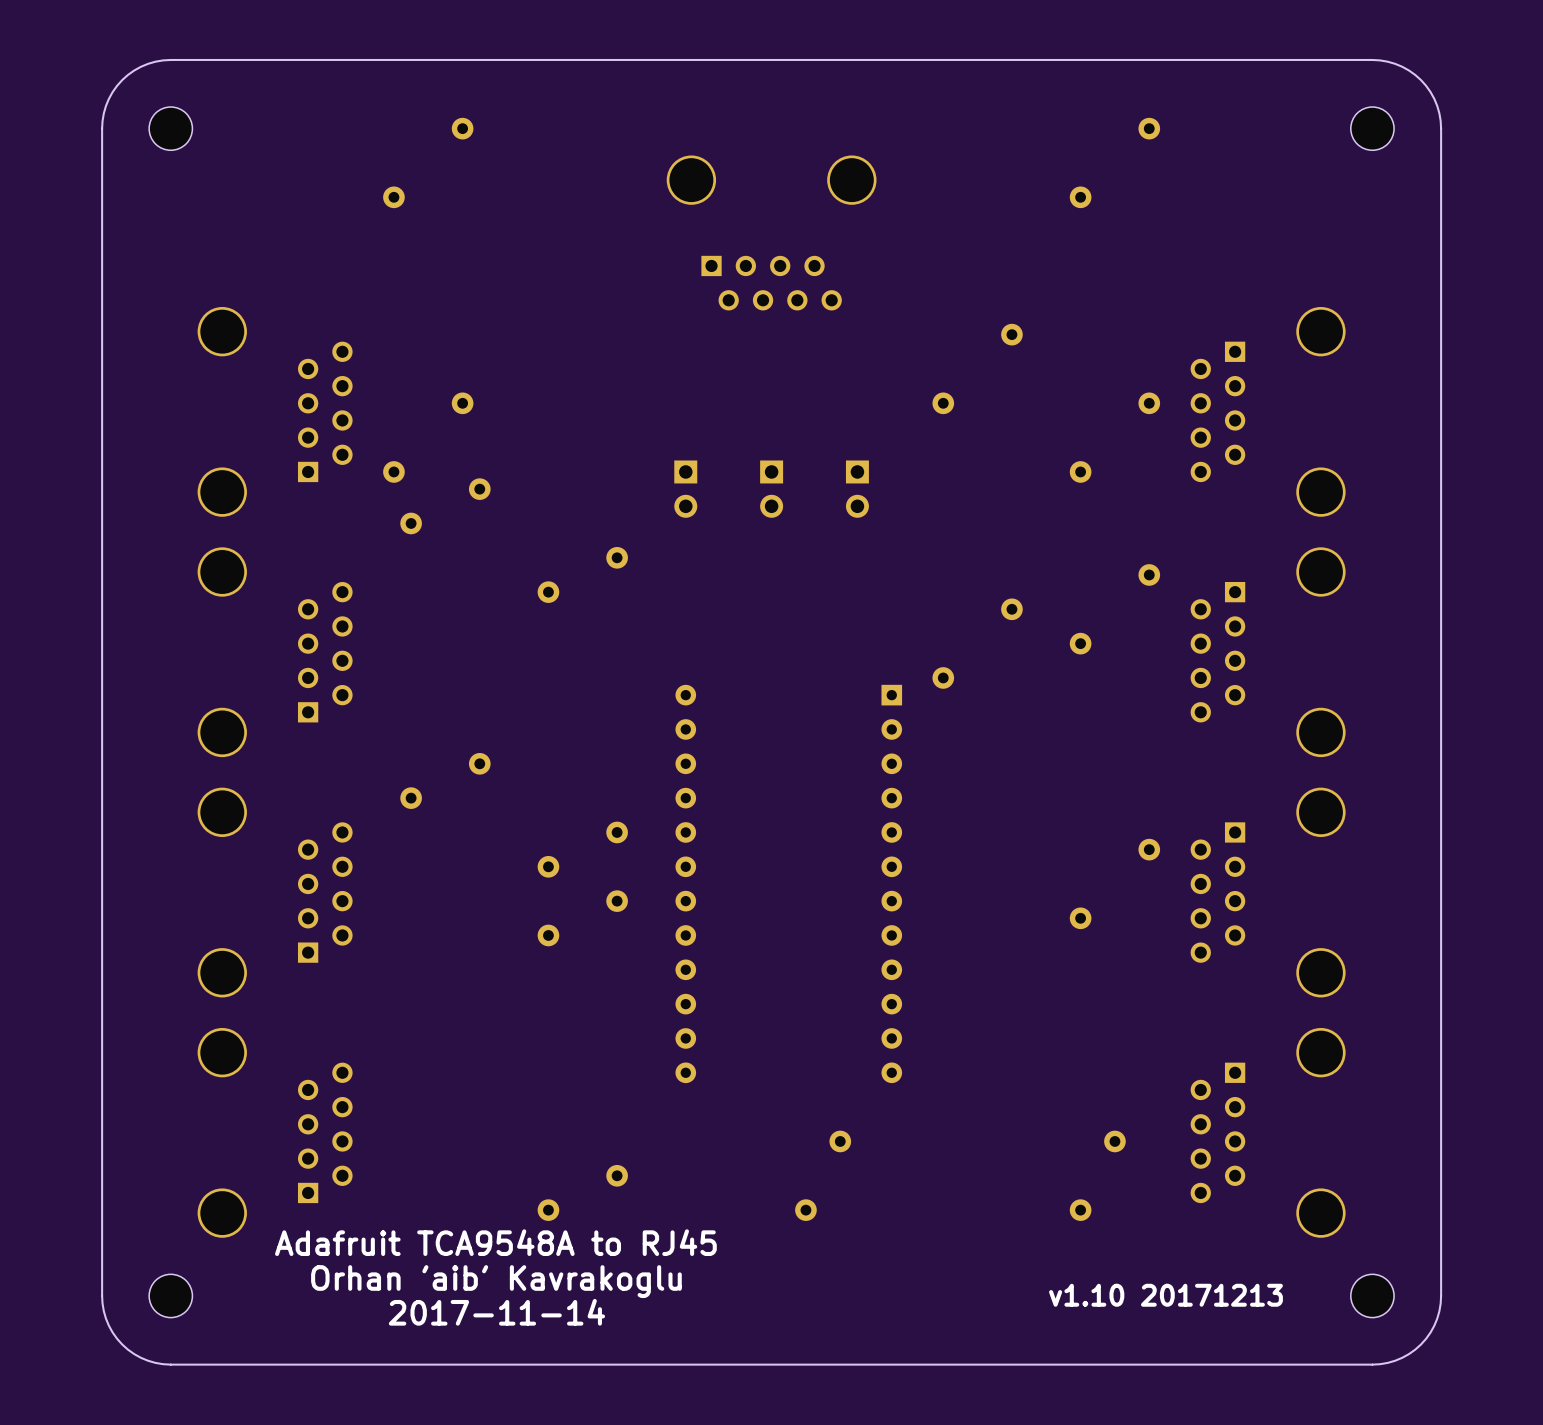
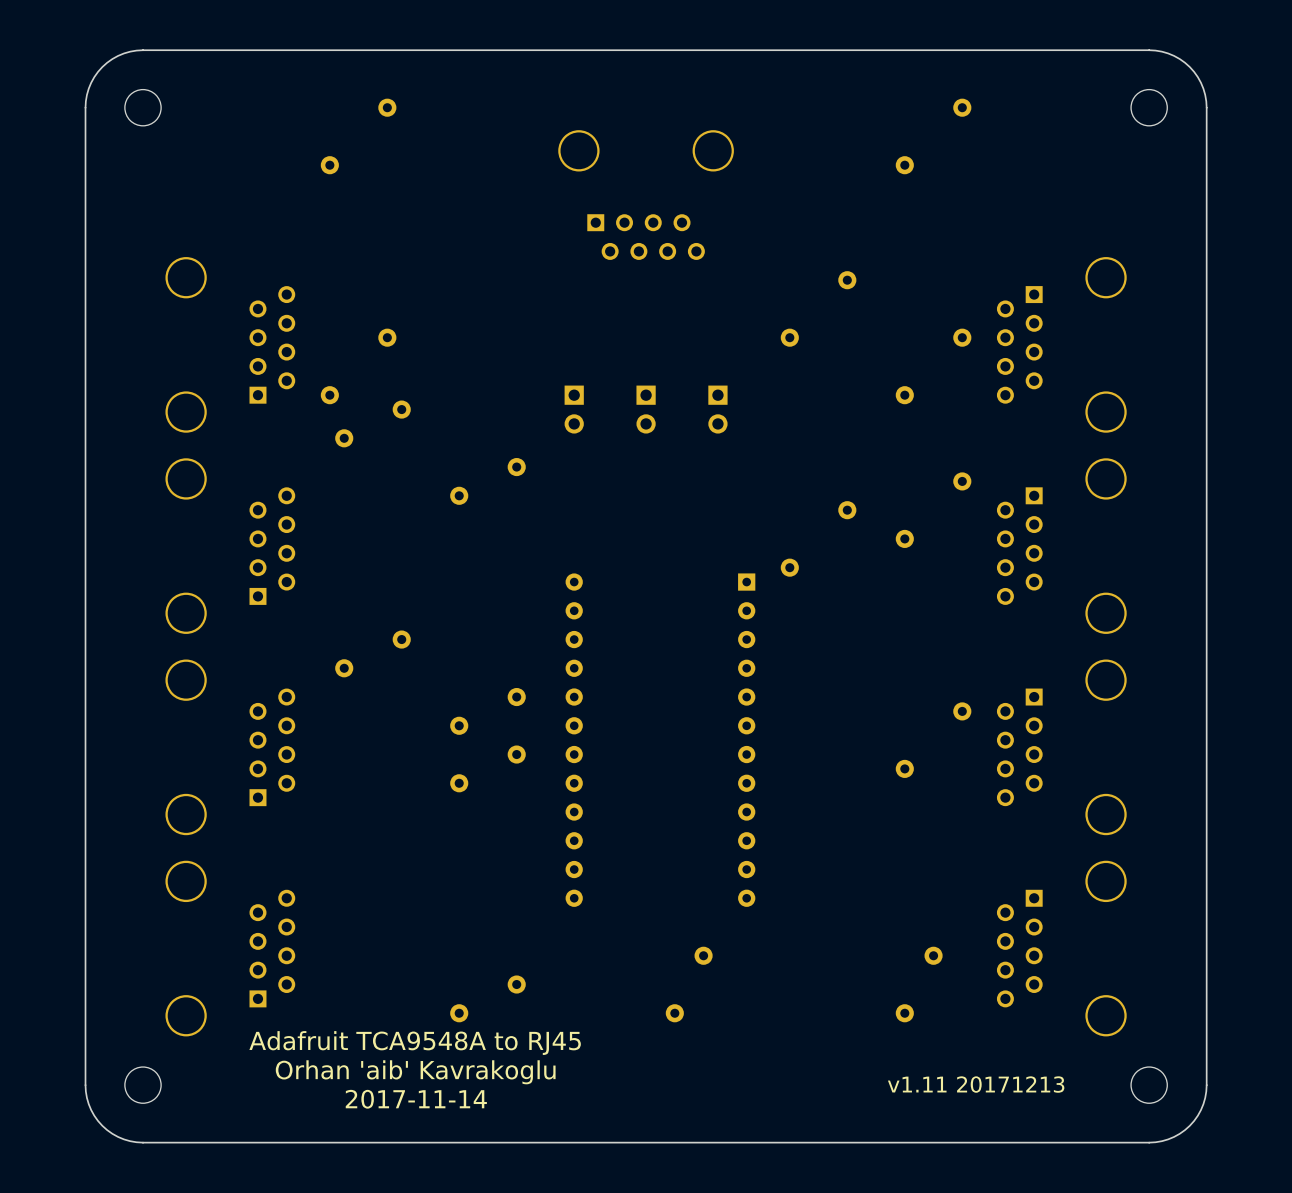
text: v1.10 20171213 (1165, 1295) -> v1.11 20171213 (976, 1084)

